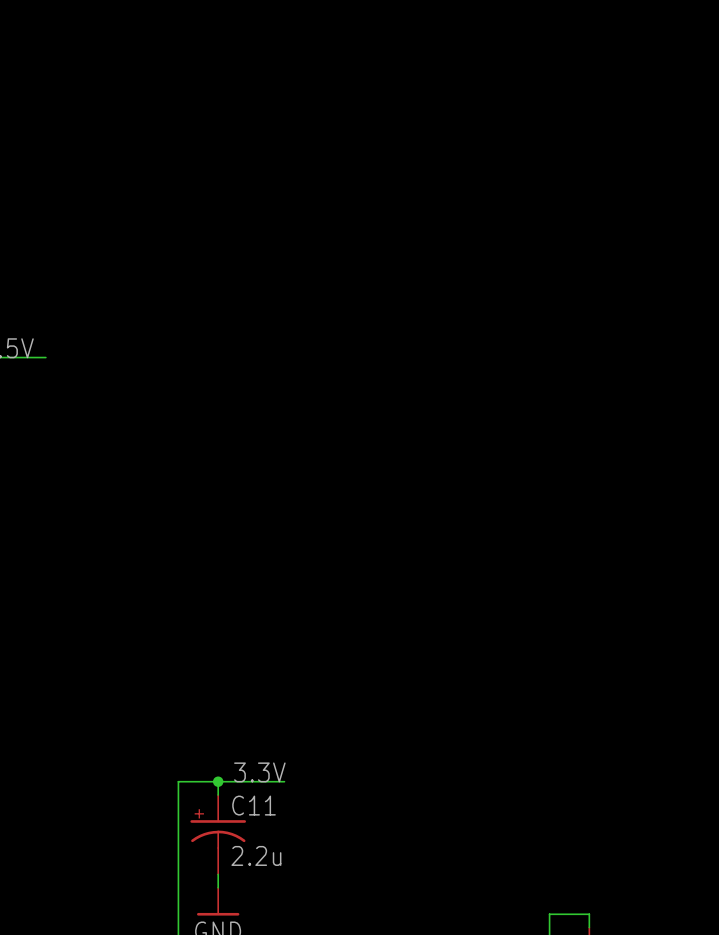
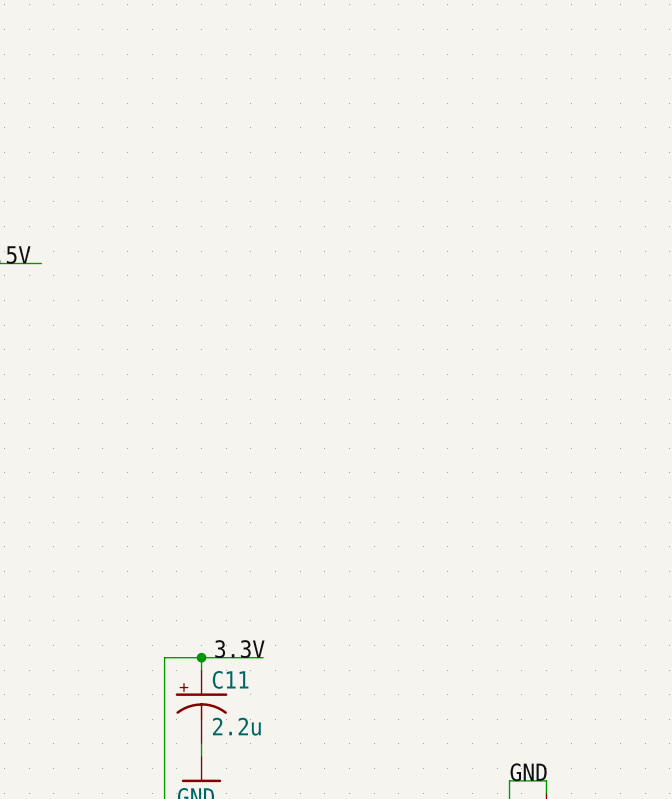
label: none -> GND (528, 772)

